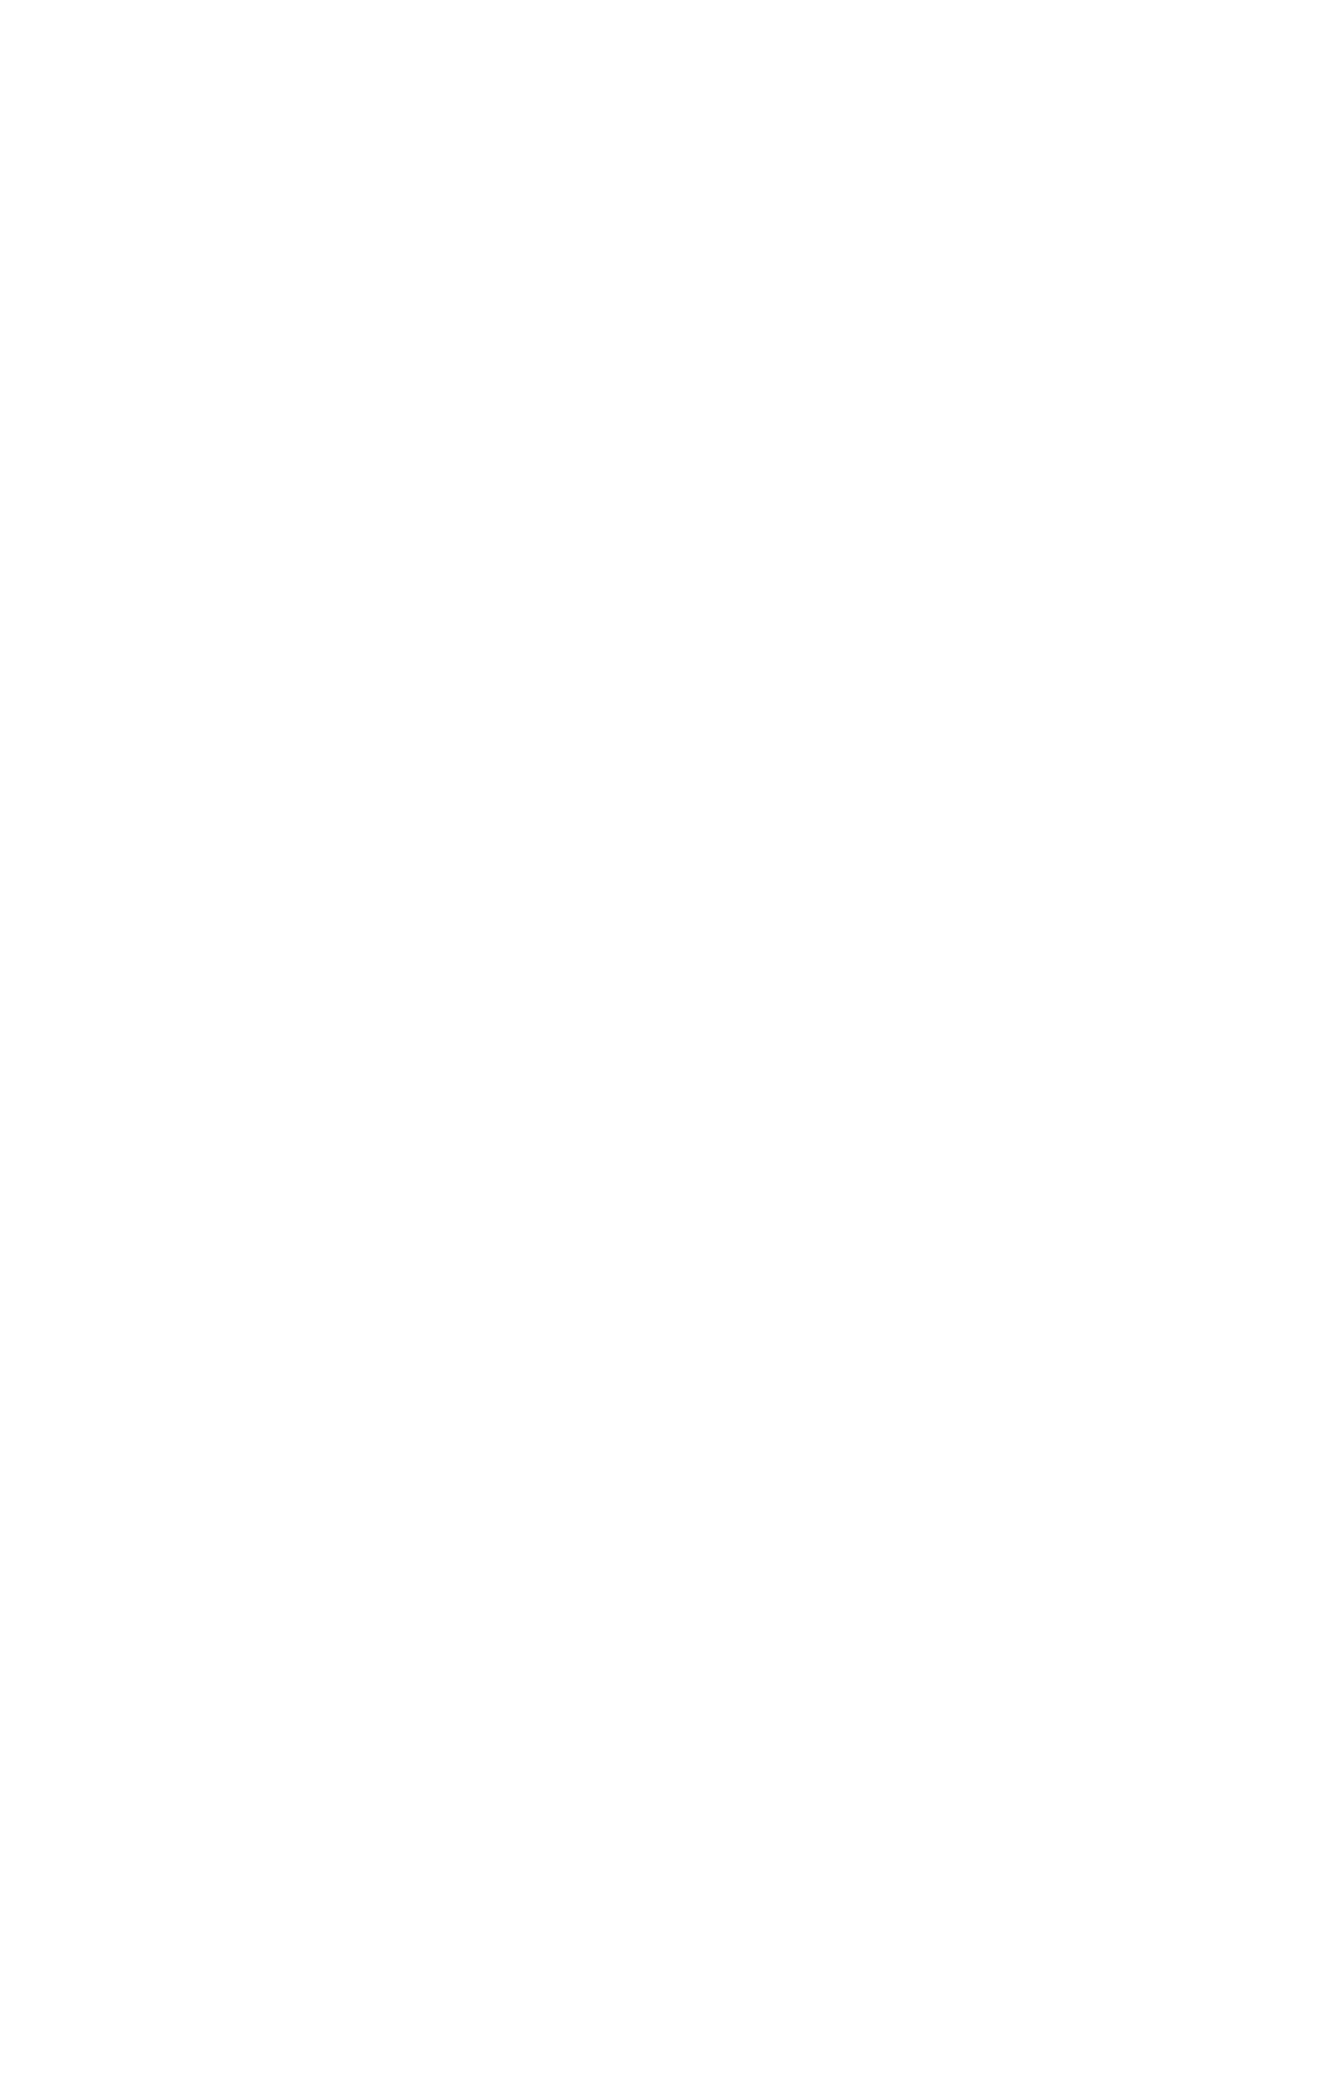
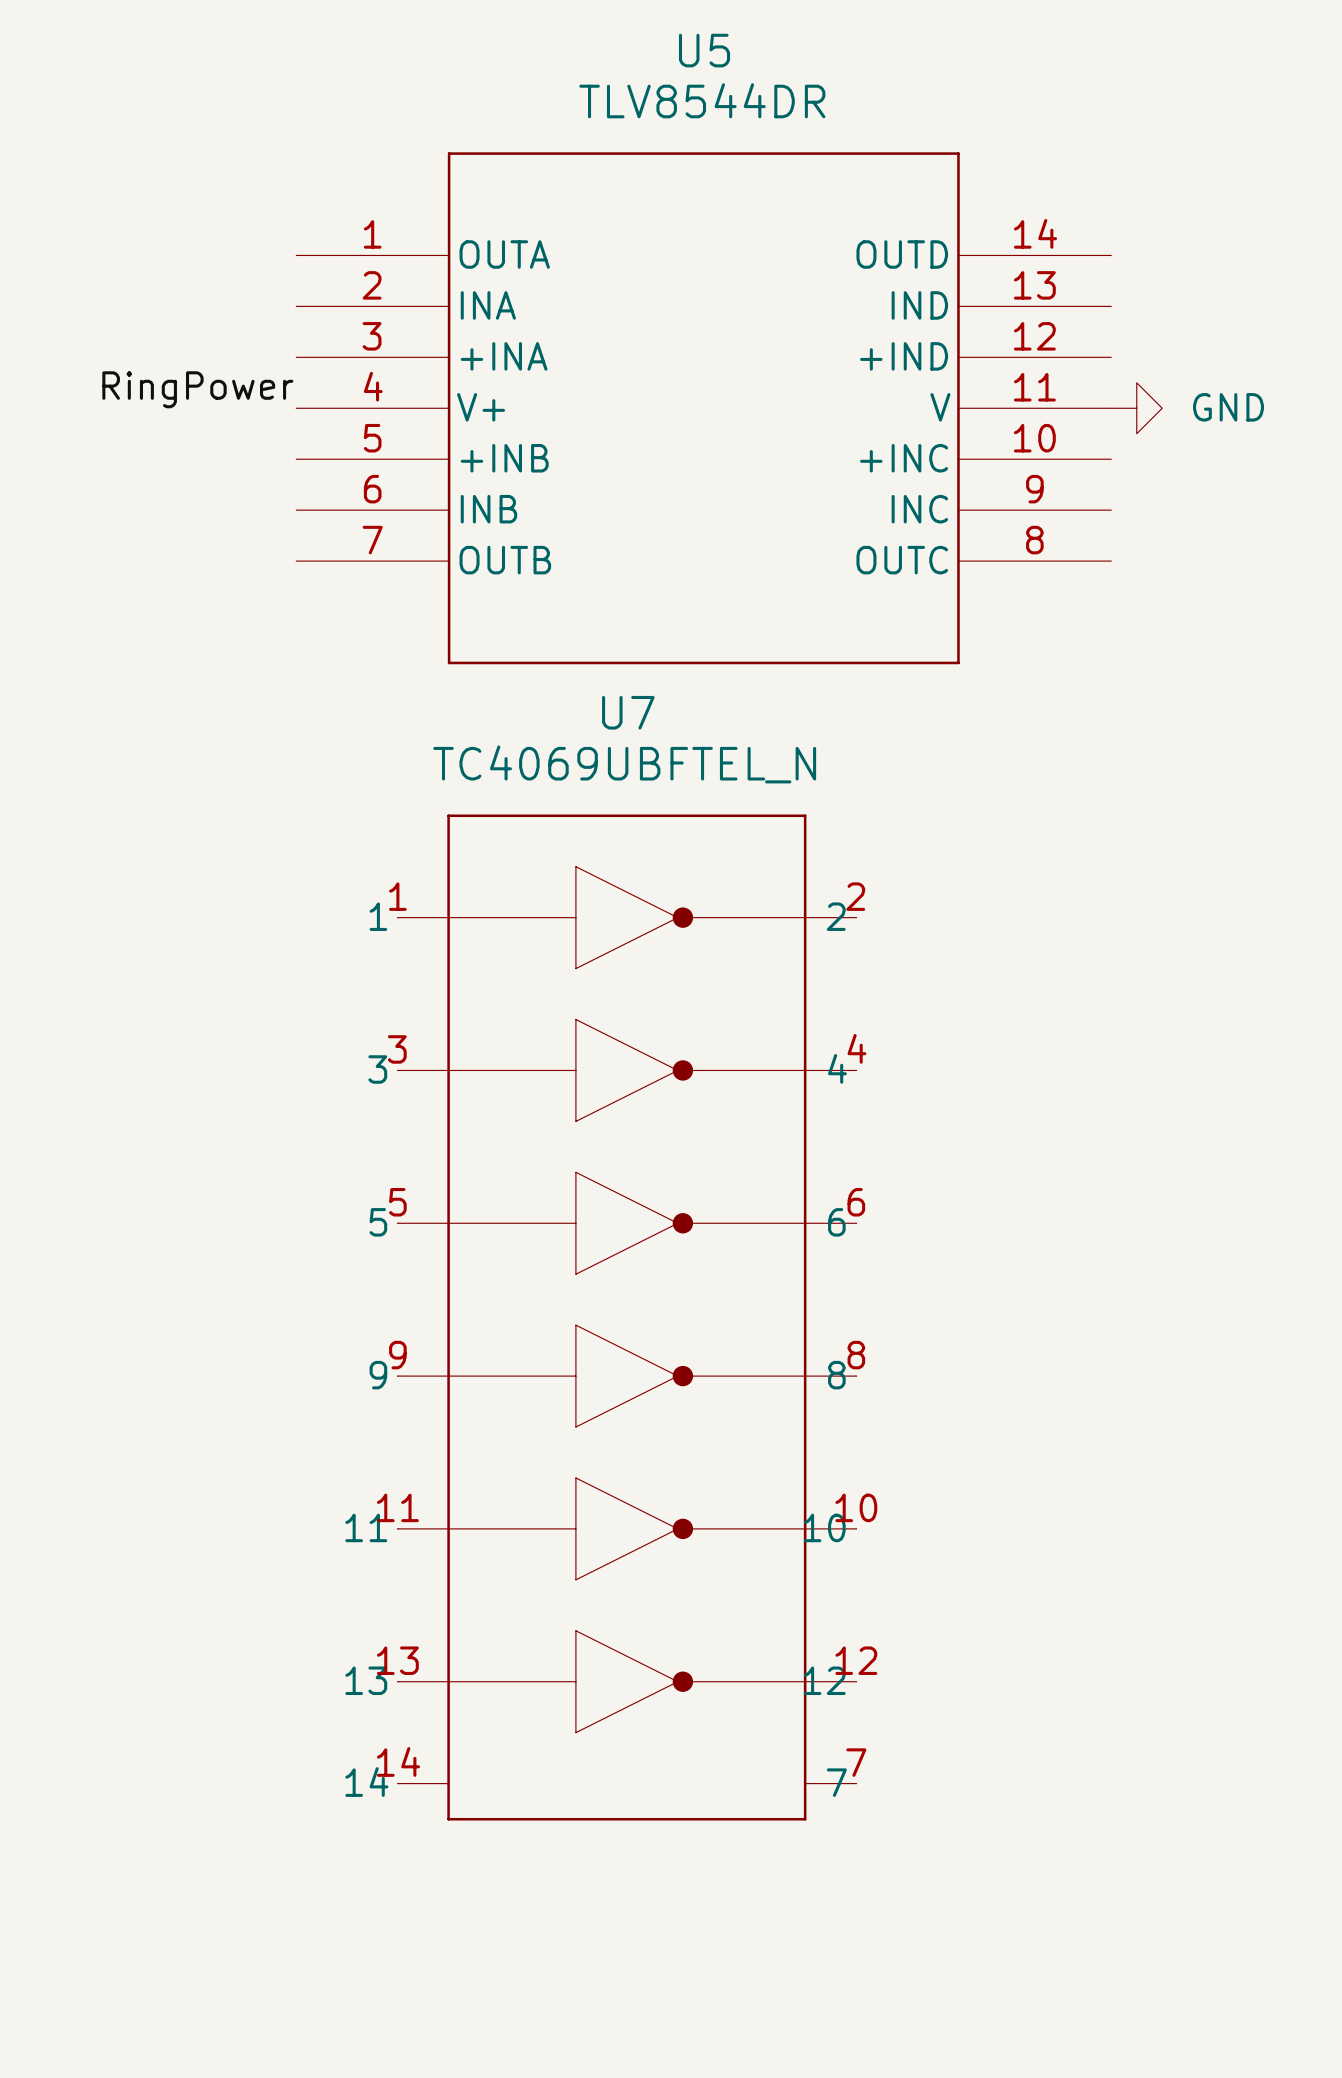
label: none -> RingPower (197, 389)
U5: none -> TLV8544DR (703, 408)
power symbol: none -> GND (1136, 408)
U7: none -> TC4069UBFTEL_N (627, 1317)

